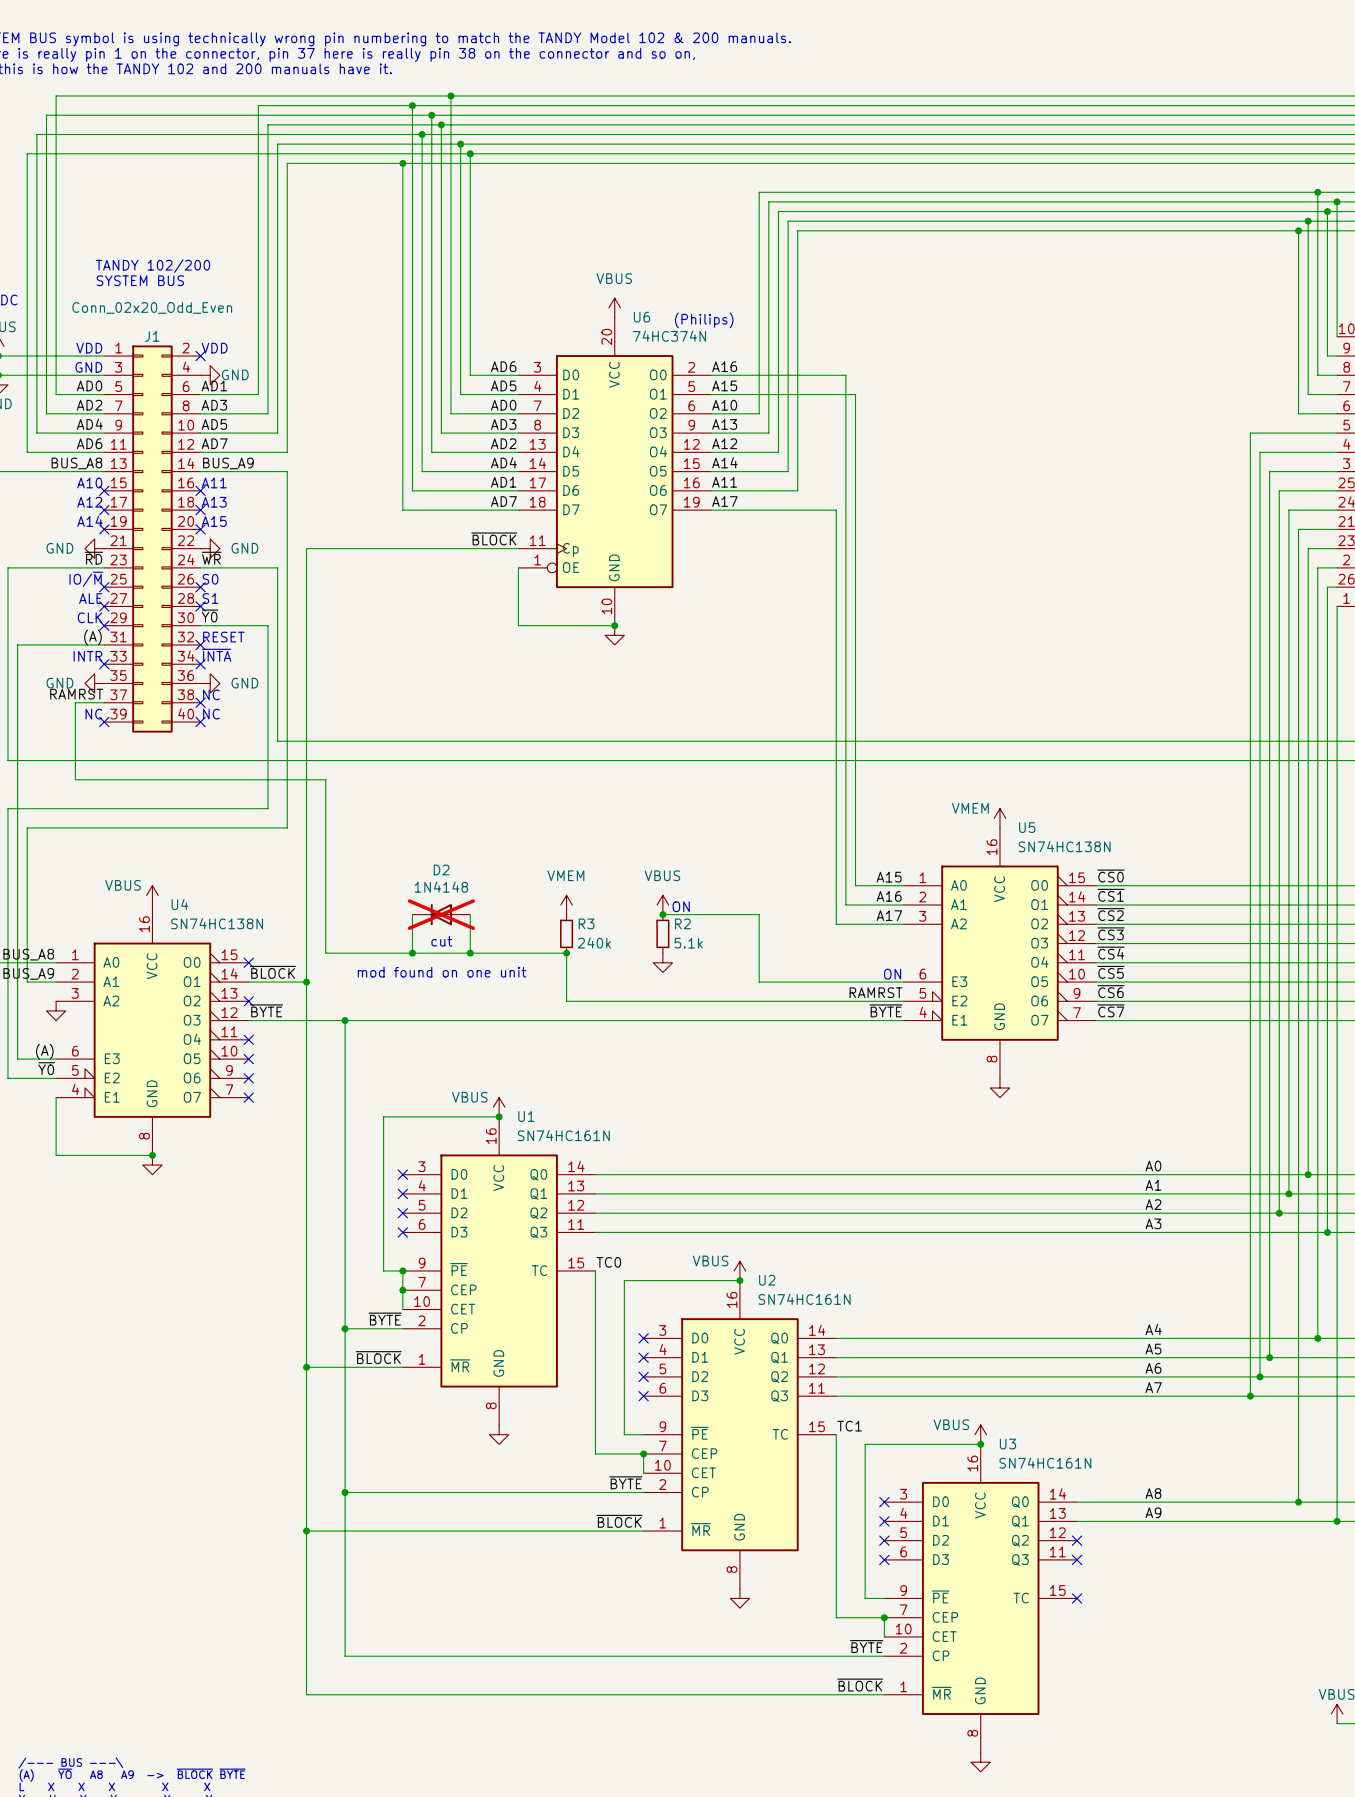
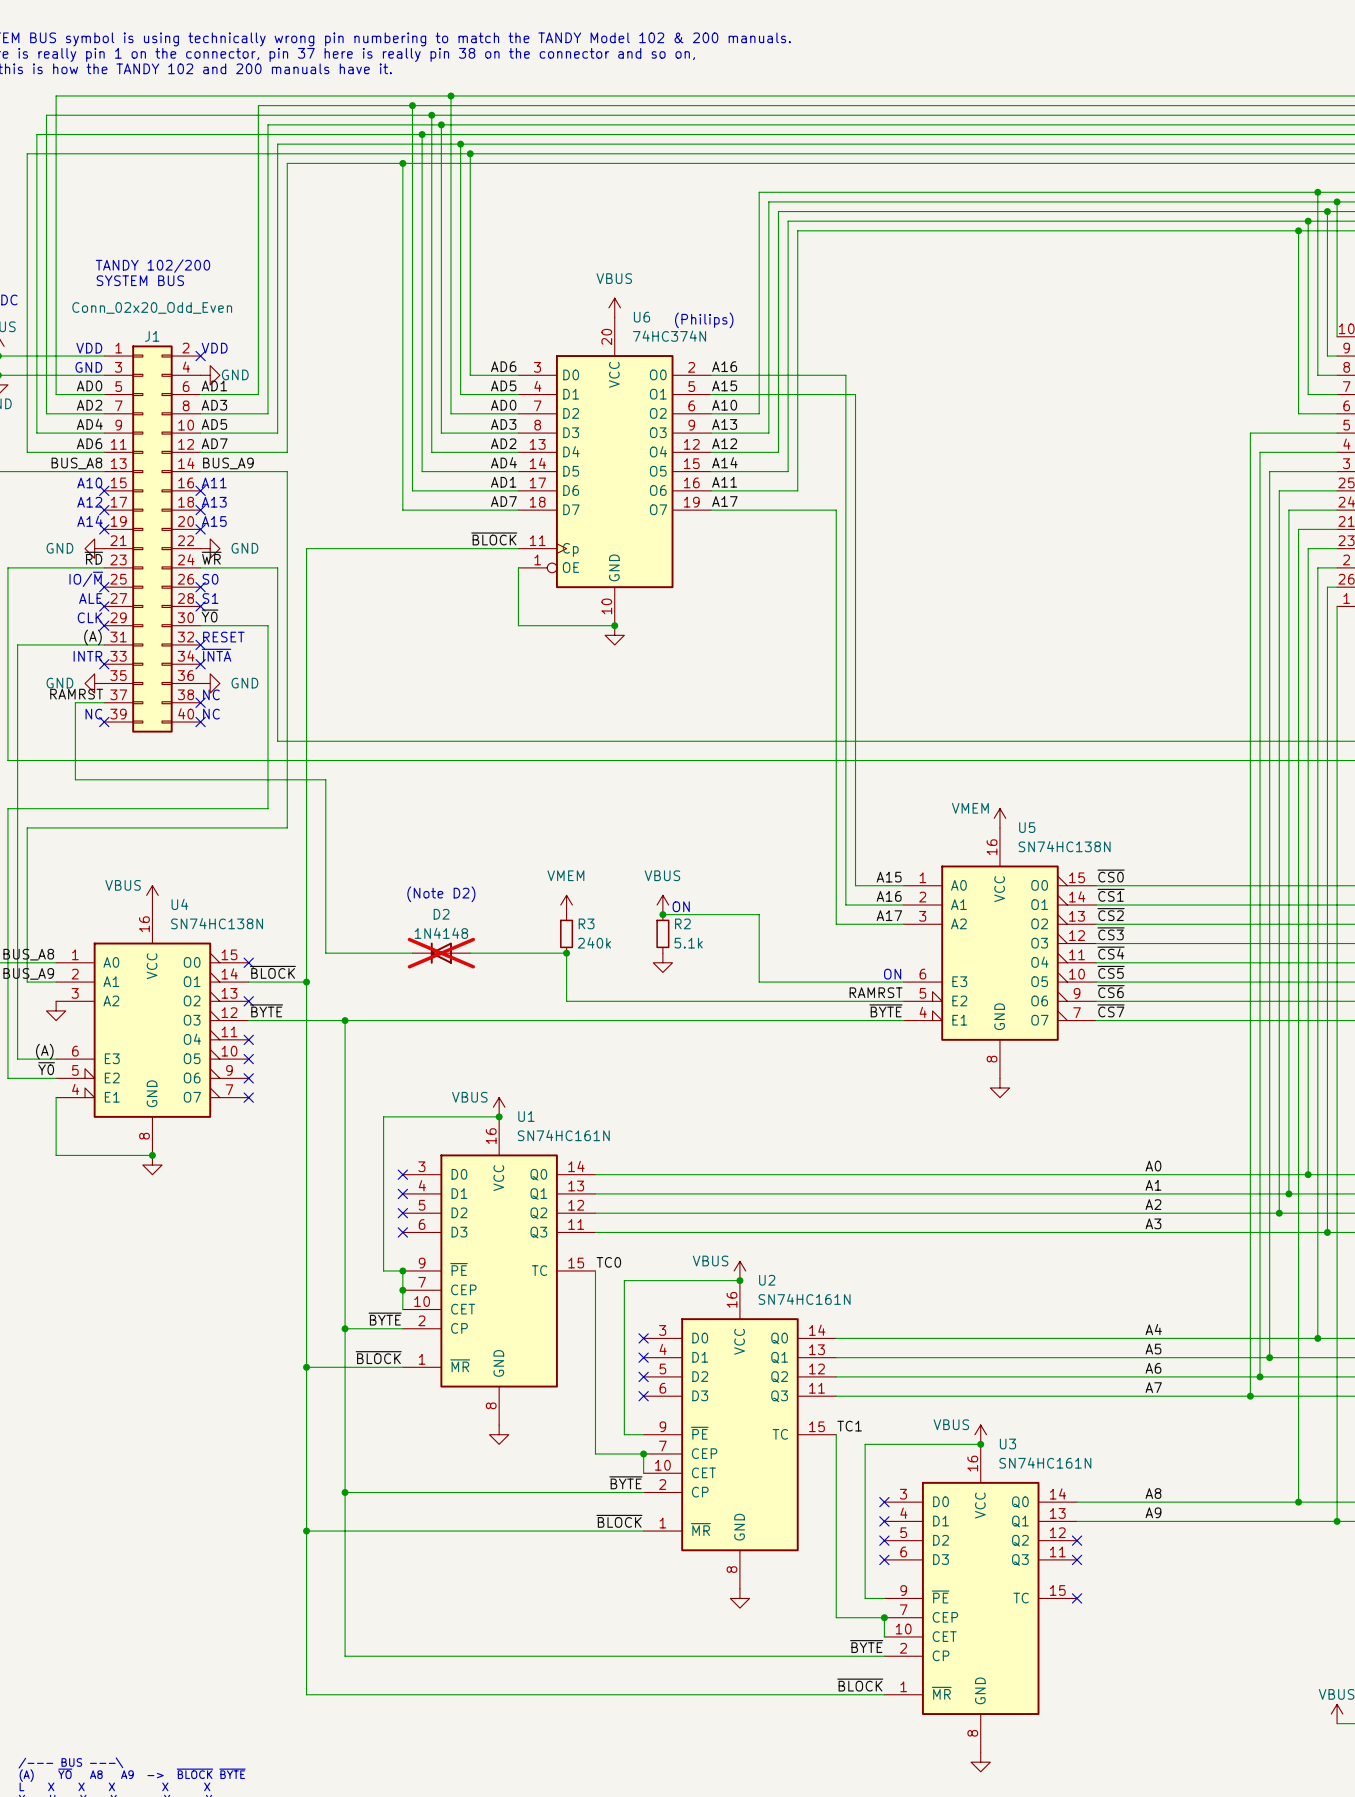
D2 name position: D2 (441, 869) -> D2 (441, 914)
D2 value position: 1N4148 (441, 887) -> 1N4148 (441, 933)
text: none -> (Note D2) (441, 894)
wire: (412, 914) (412, 953) (470, 953) (470, 914) -> none
D2 position: (441, 914) -> (441, 953)
text: cut (441, 941) -> none
junction: (412, 953) -> none
junction: (470, 953) -> none
text: mod found on one unit (442, 972) -> none

